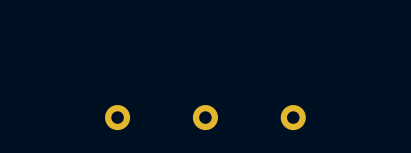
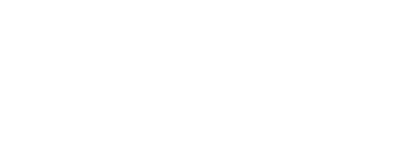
part: (117, 117) -> none
part: (205, 117) -> none
part: (293, 117) -> none

